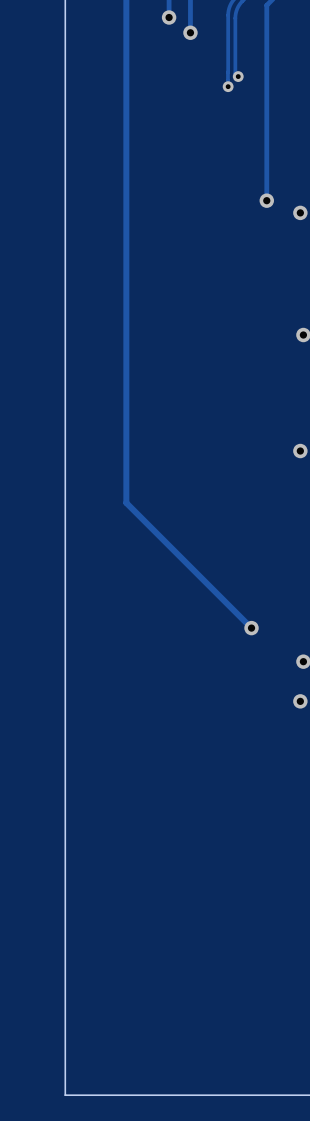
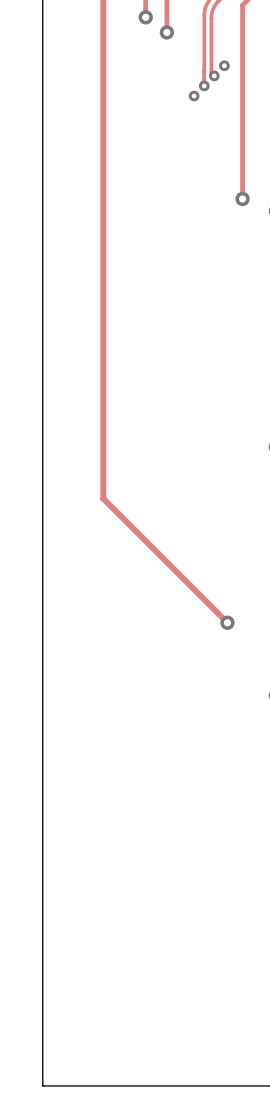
via: none -> (224, 65)
via: none -> (194, 96)

